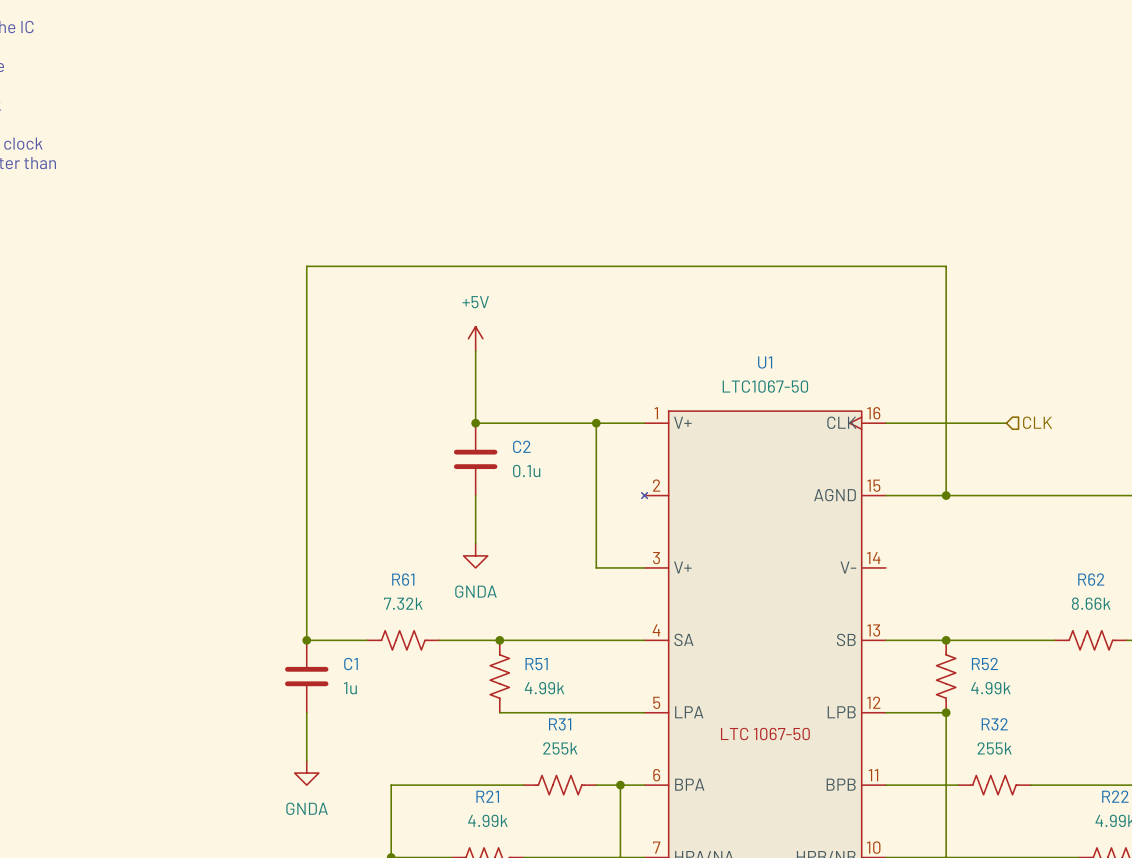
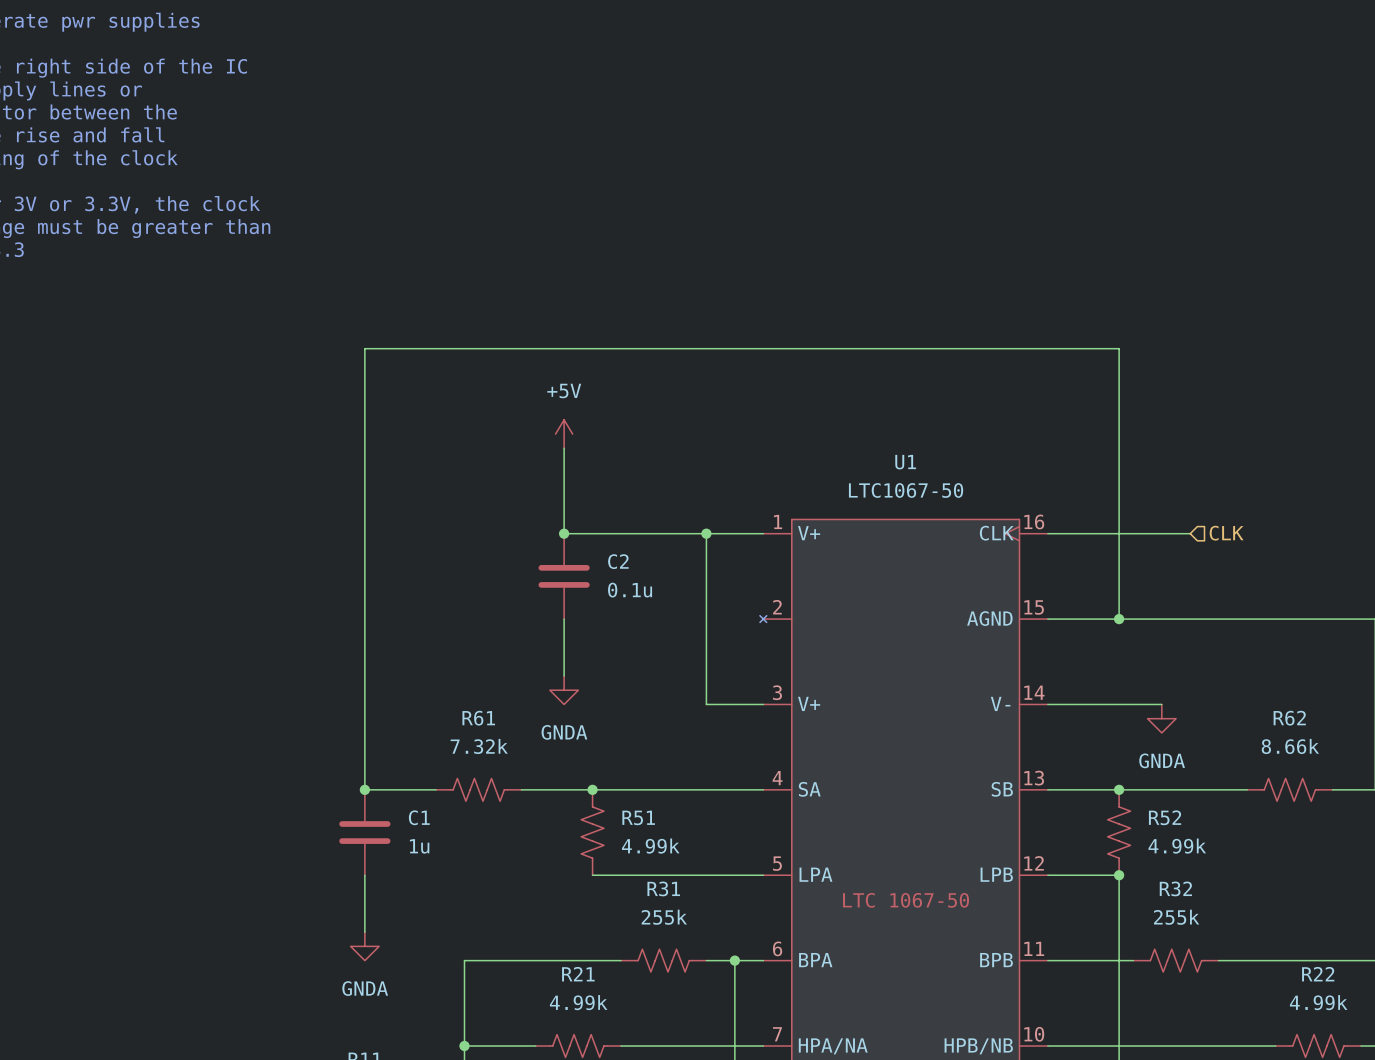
wire: none -> (1047, 704) (1161, 704)
power symbol: none -> GNDA (1161, 718)

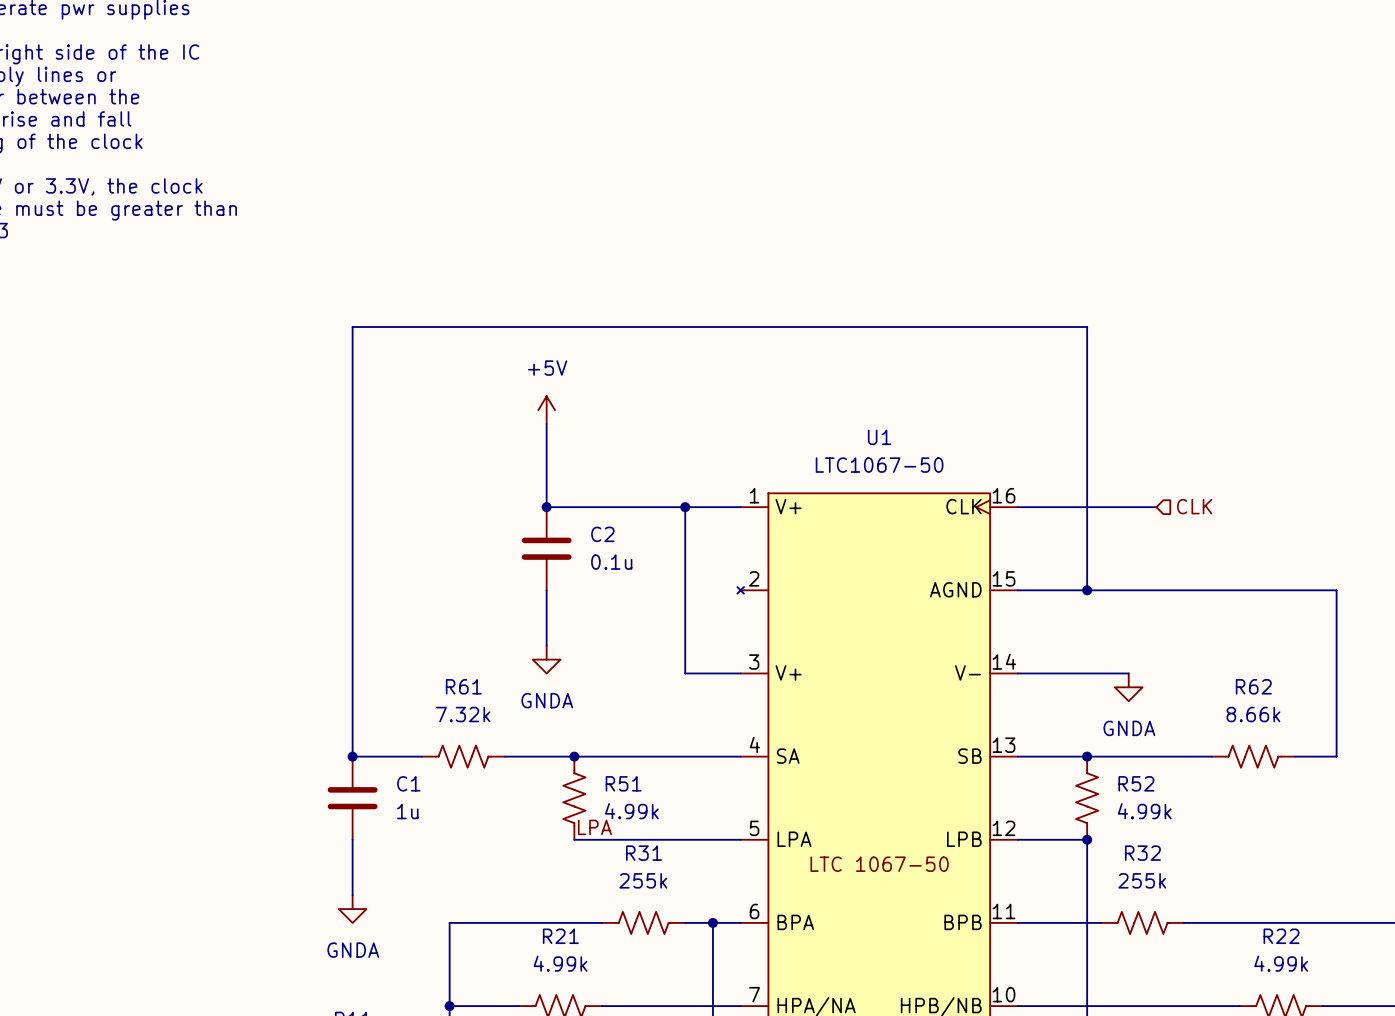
label: none -> LPA (594, 827)

